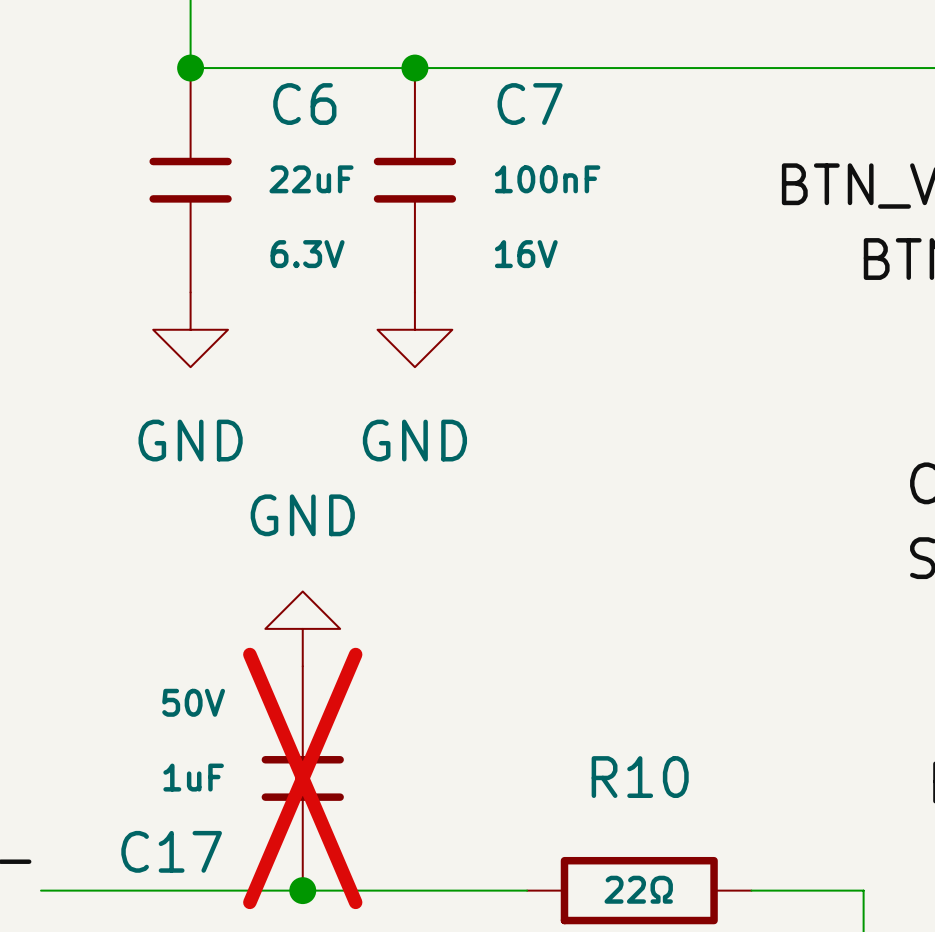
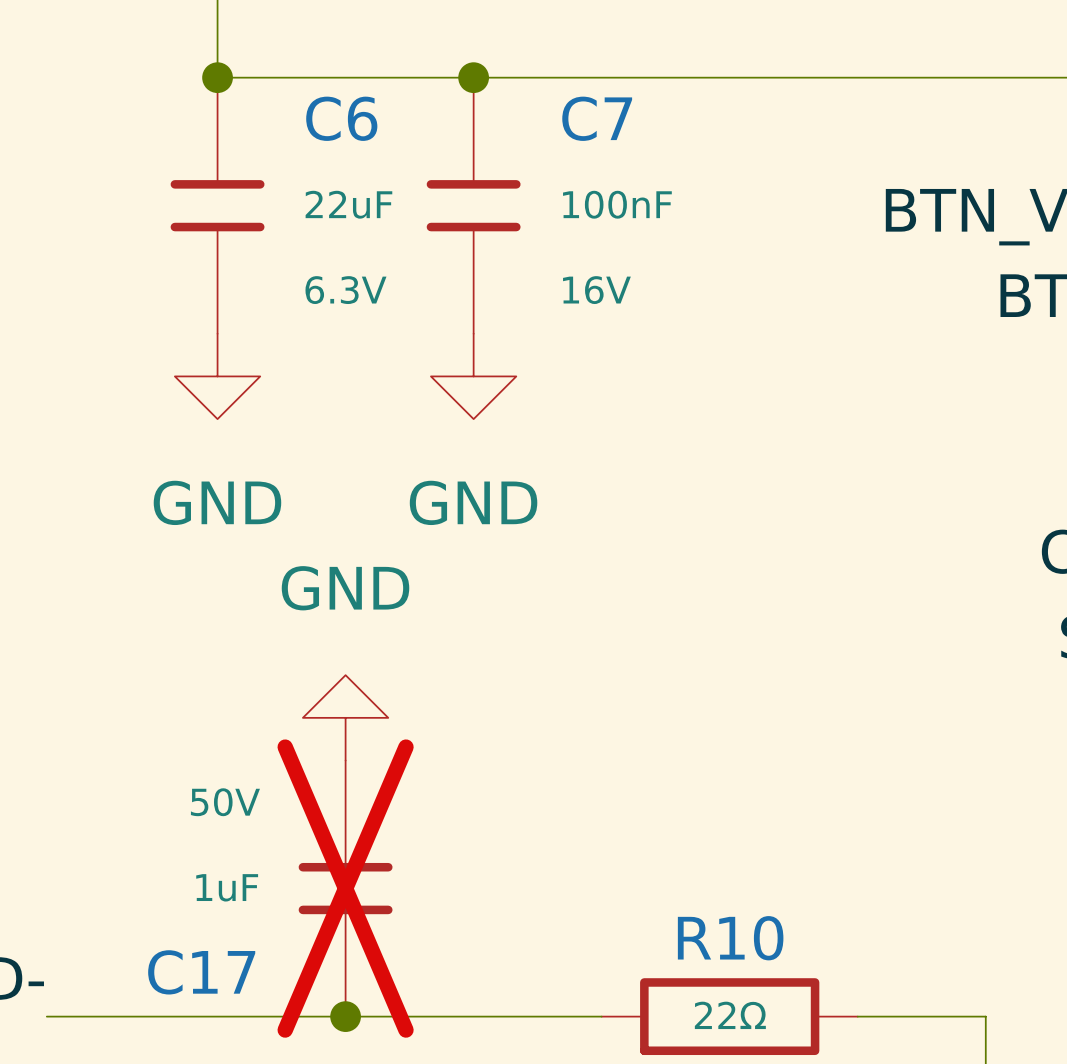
R10 name position: R10 (640, 777) -> R10 (730, 938)

